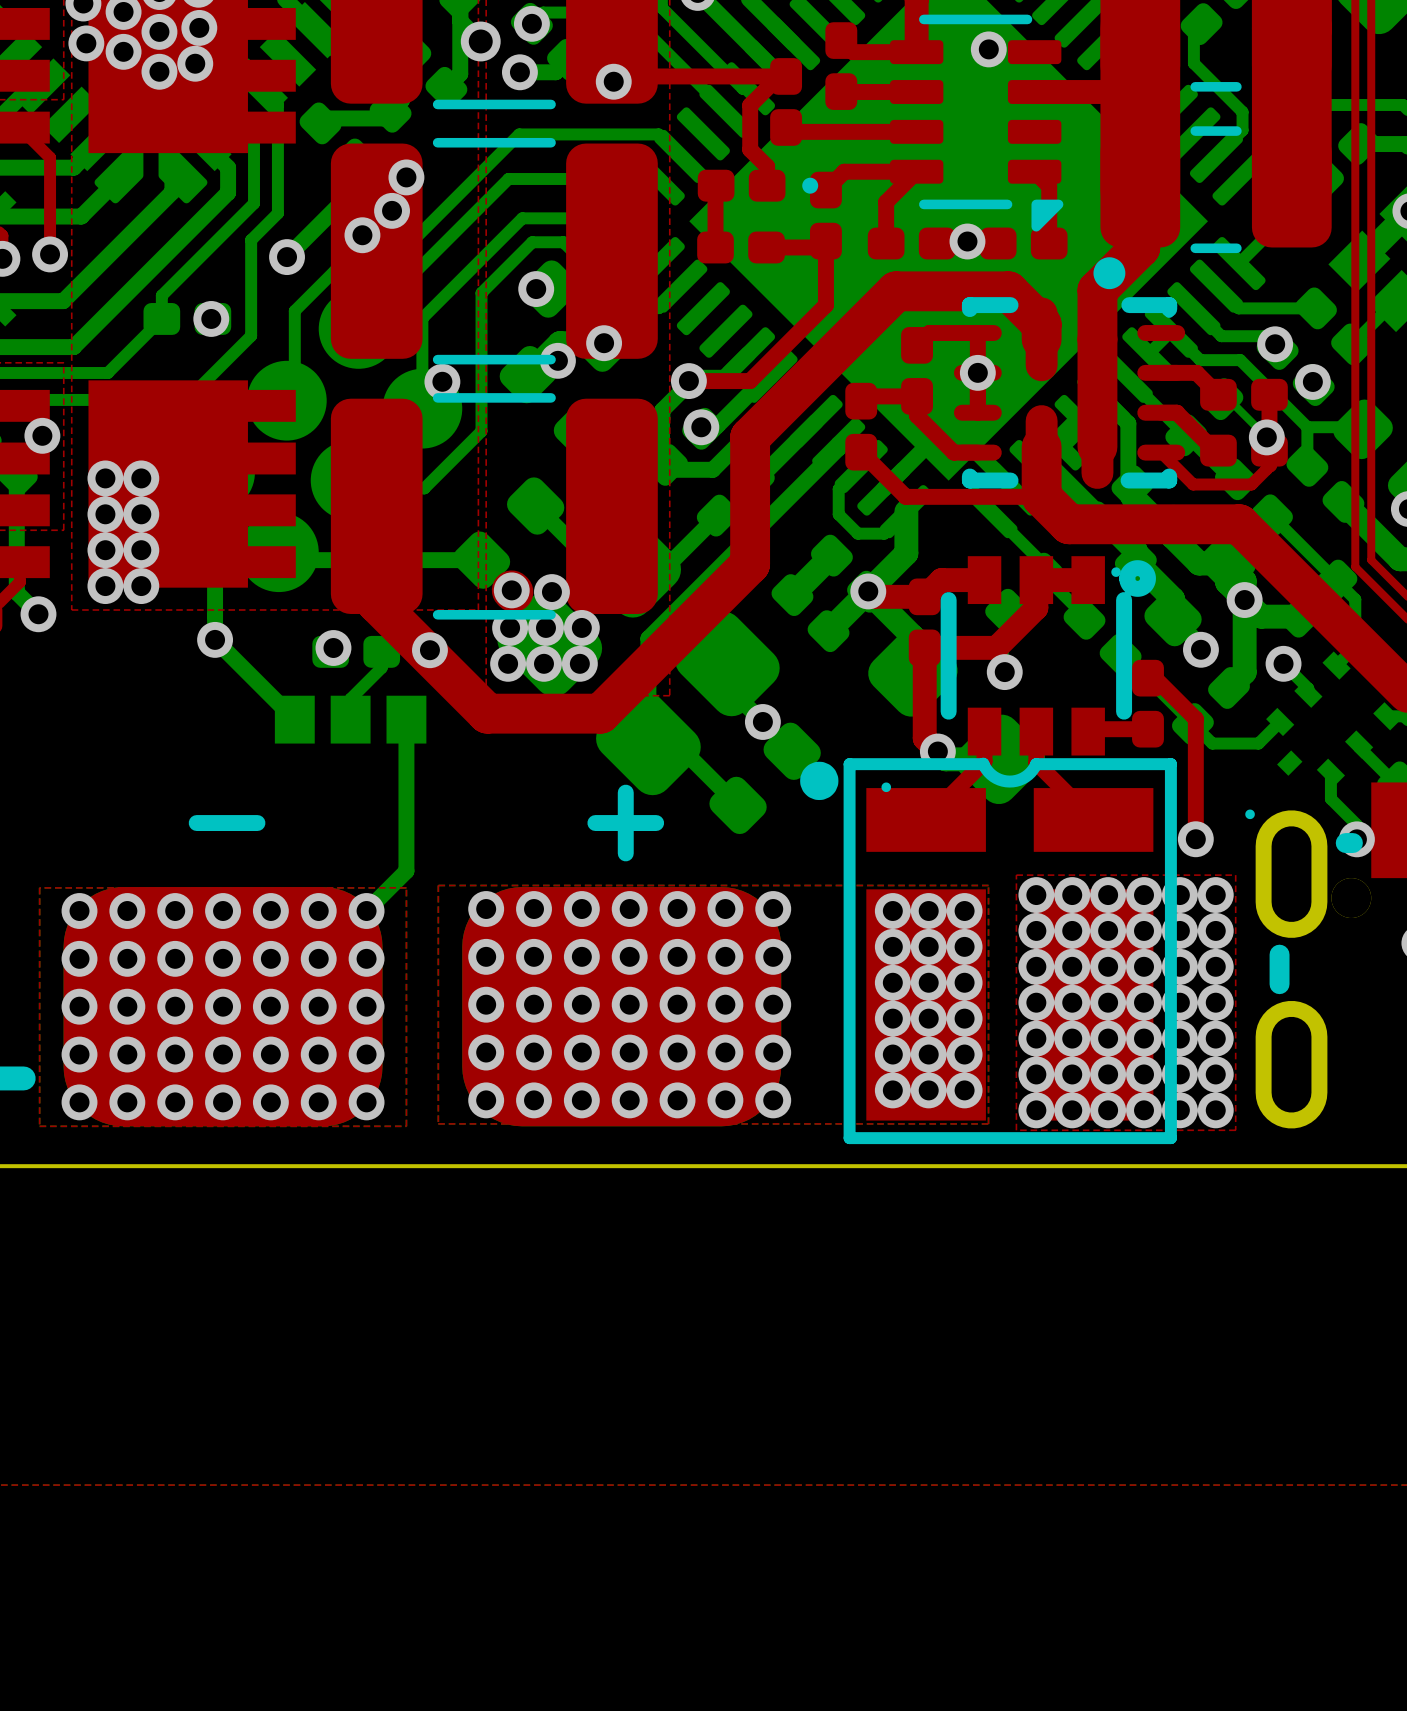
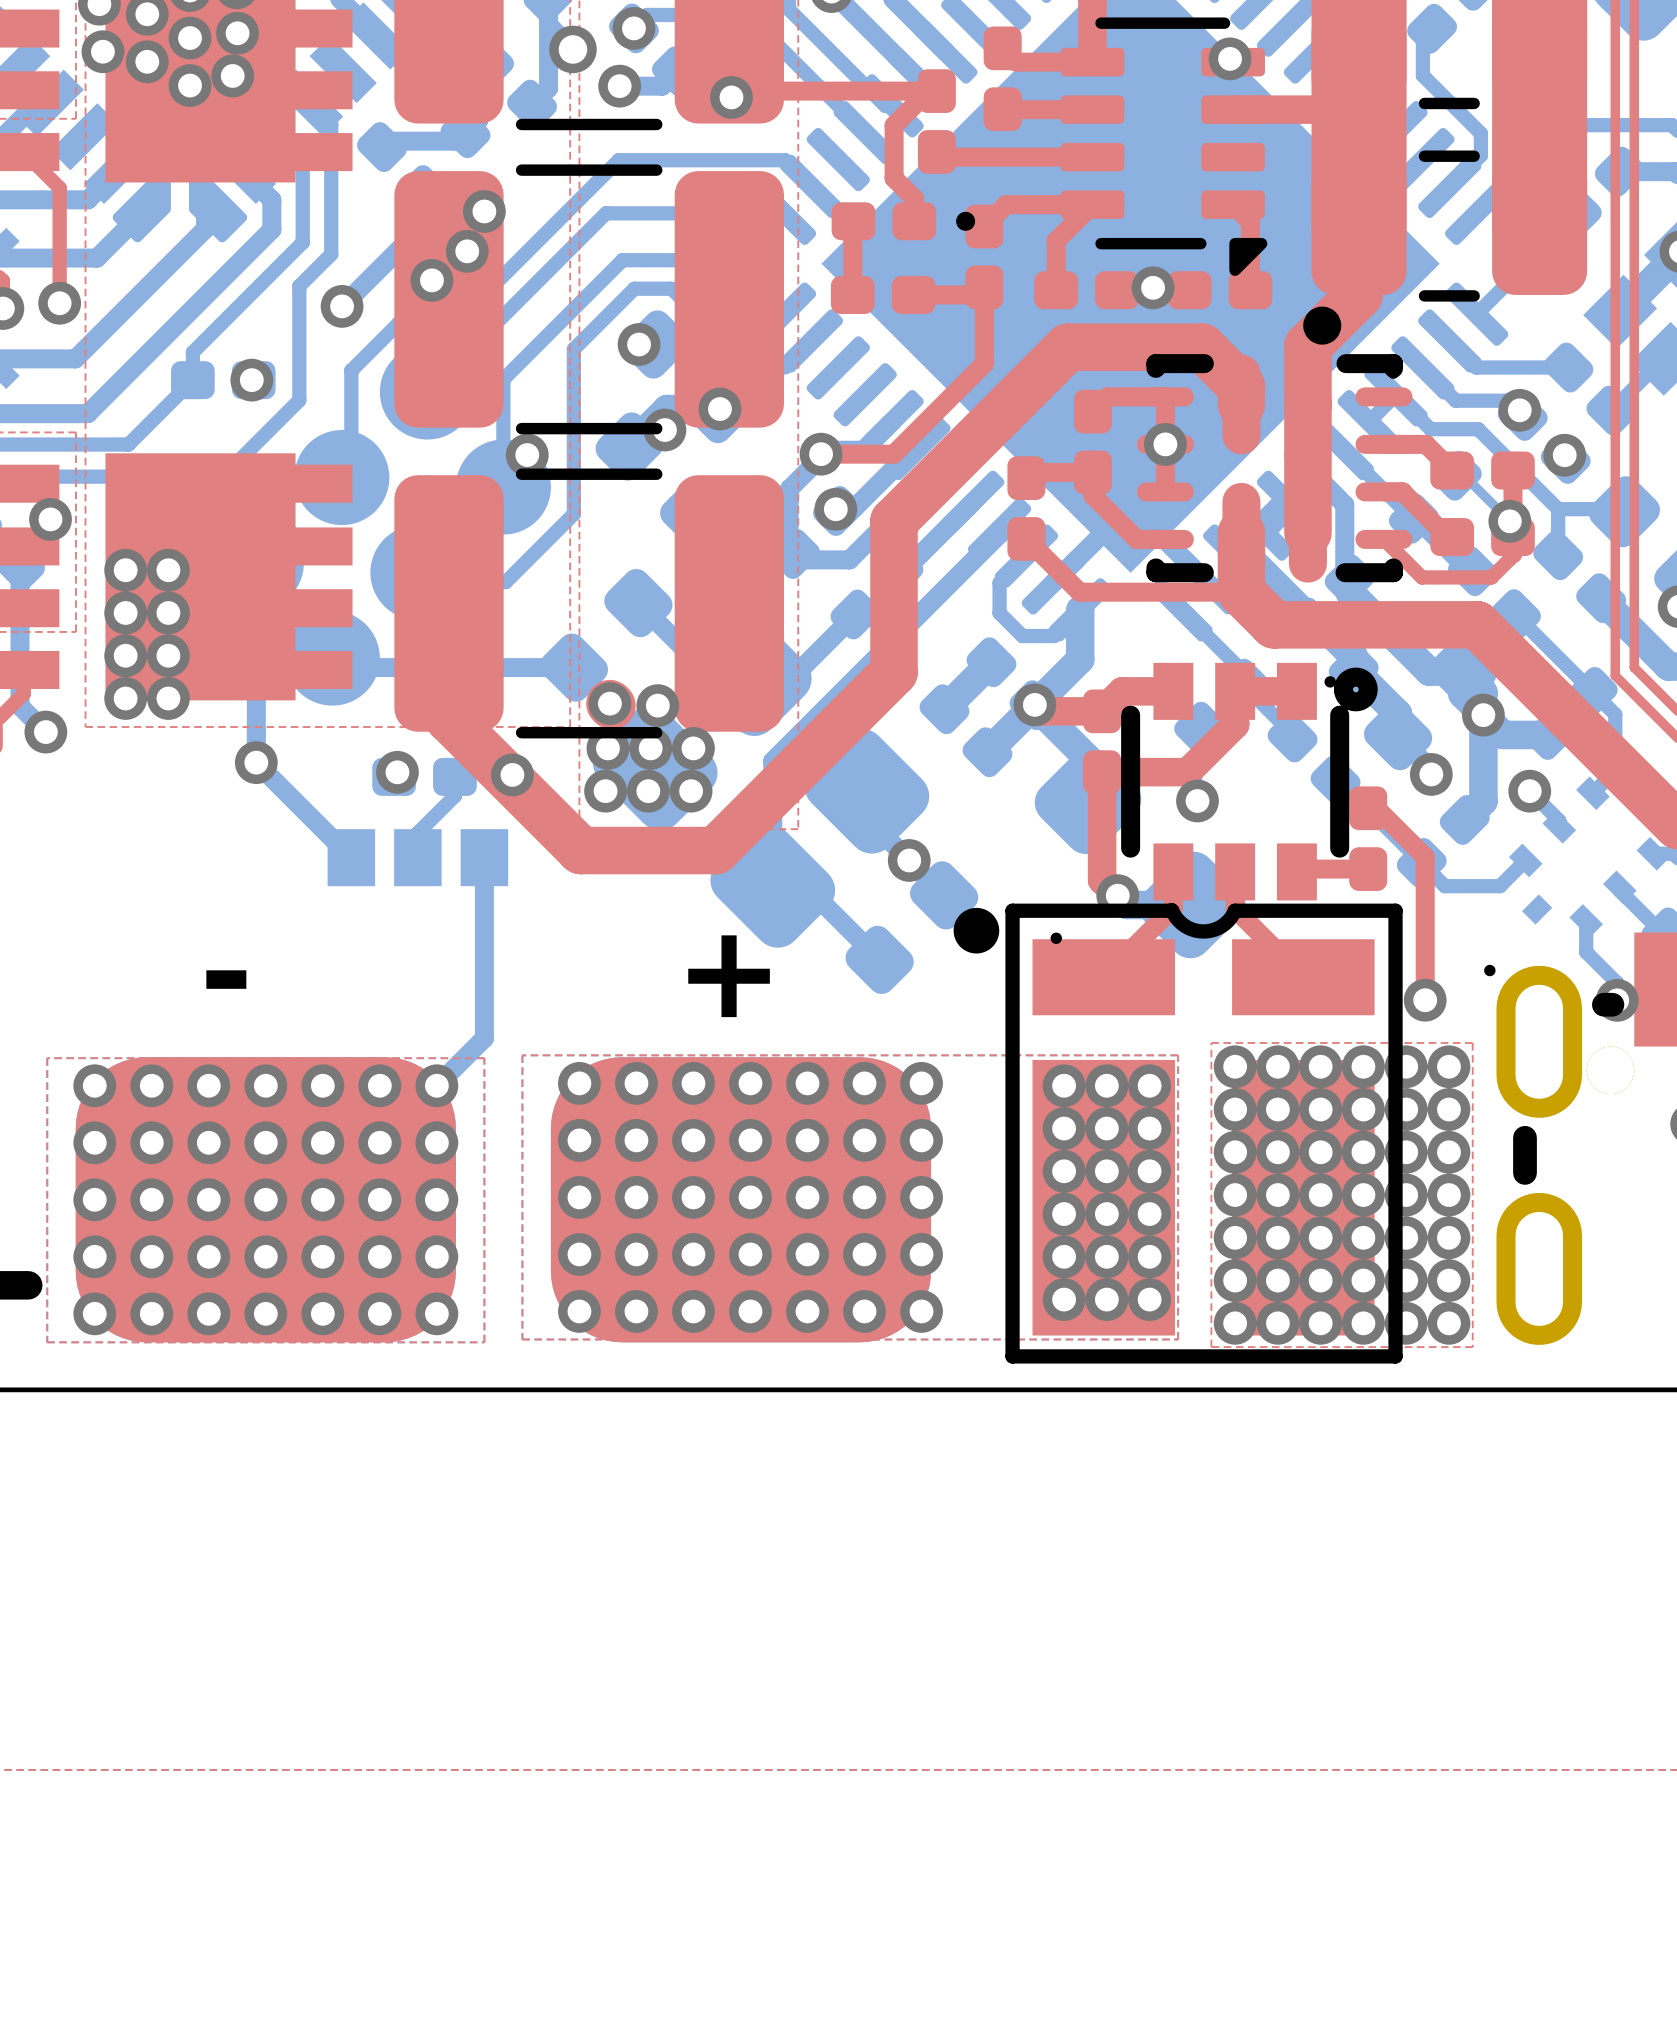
via position: (988, 49) -> (1230, 58)

